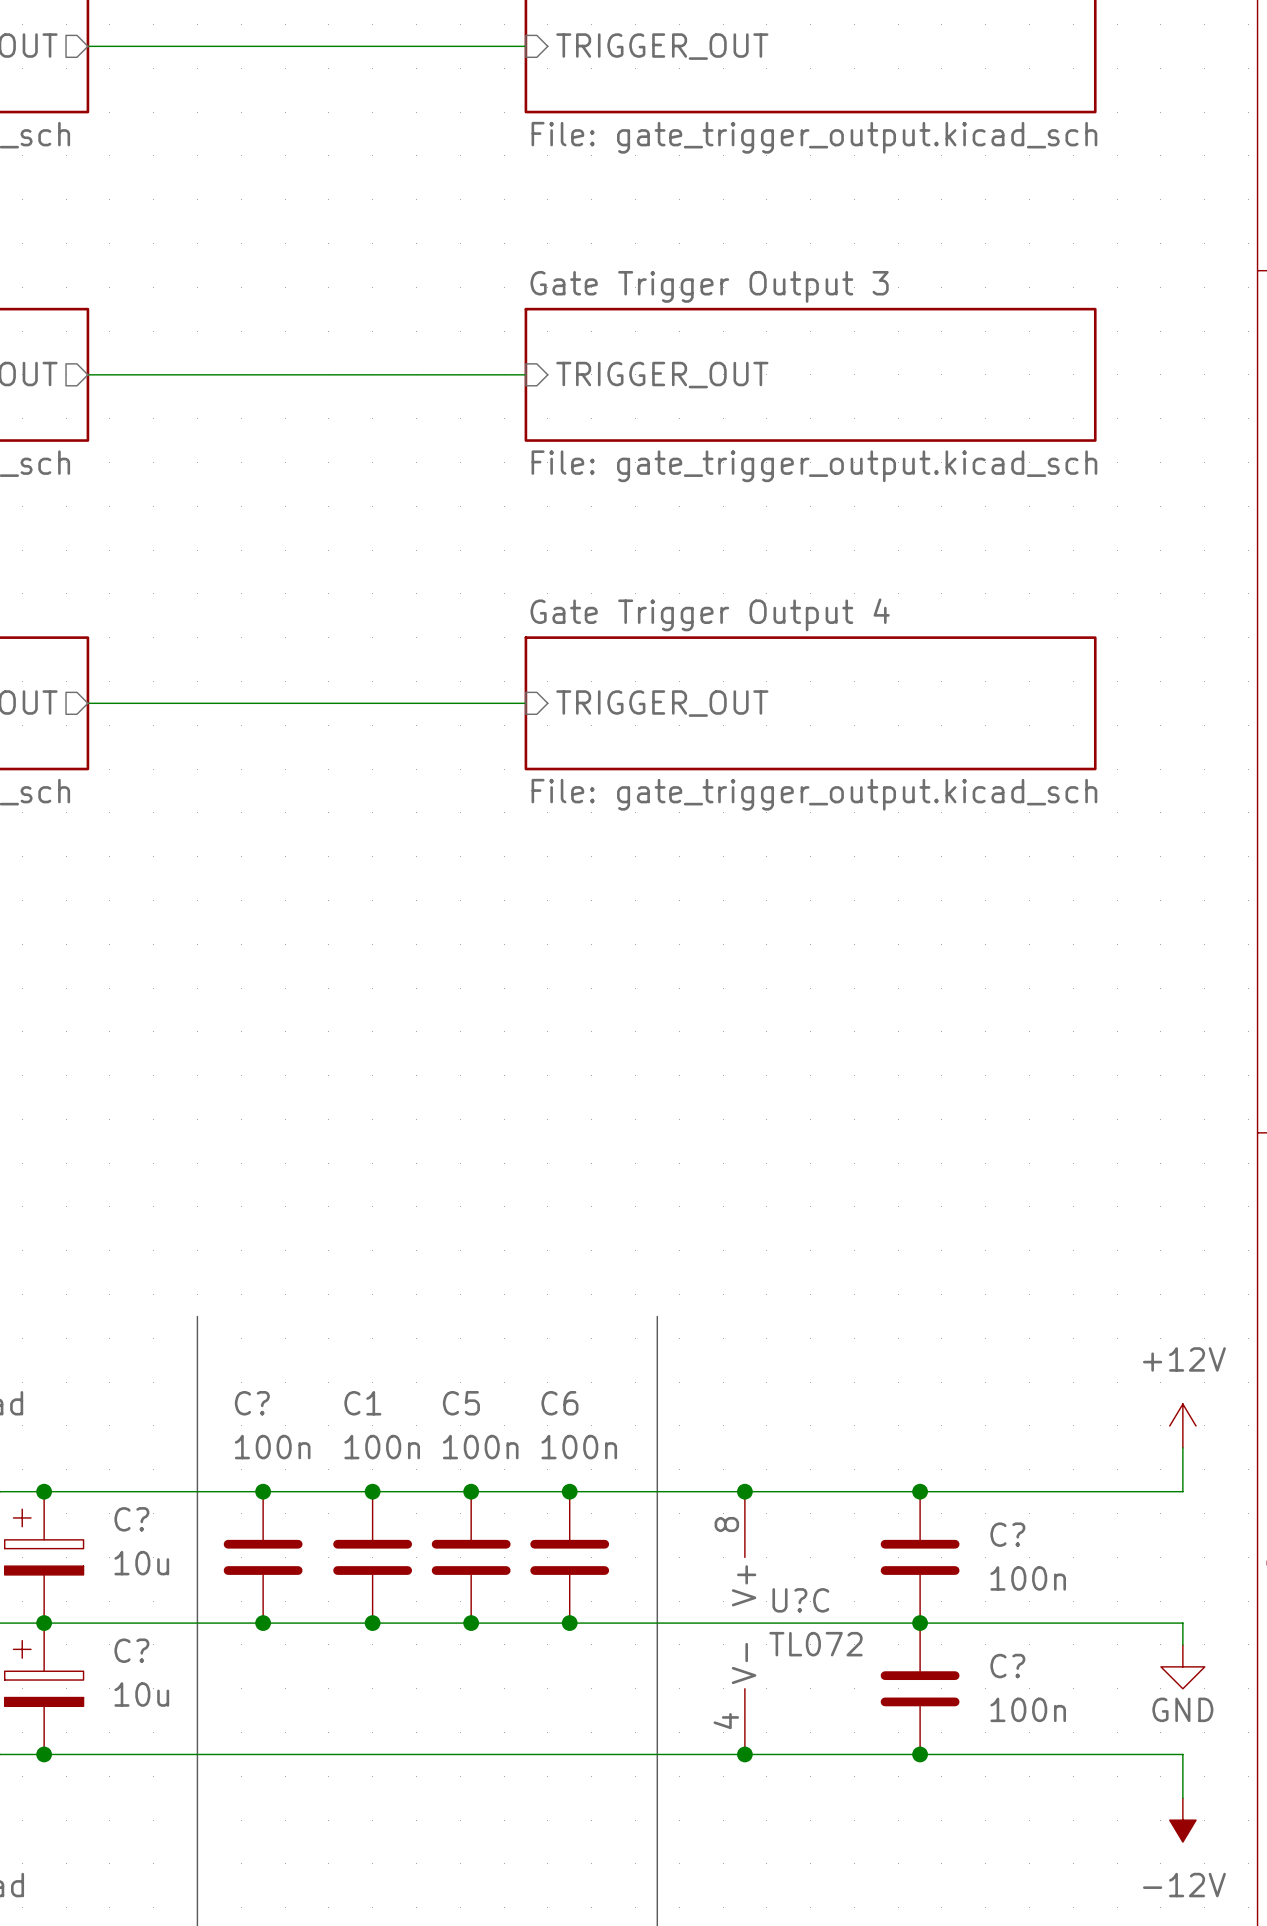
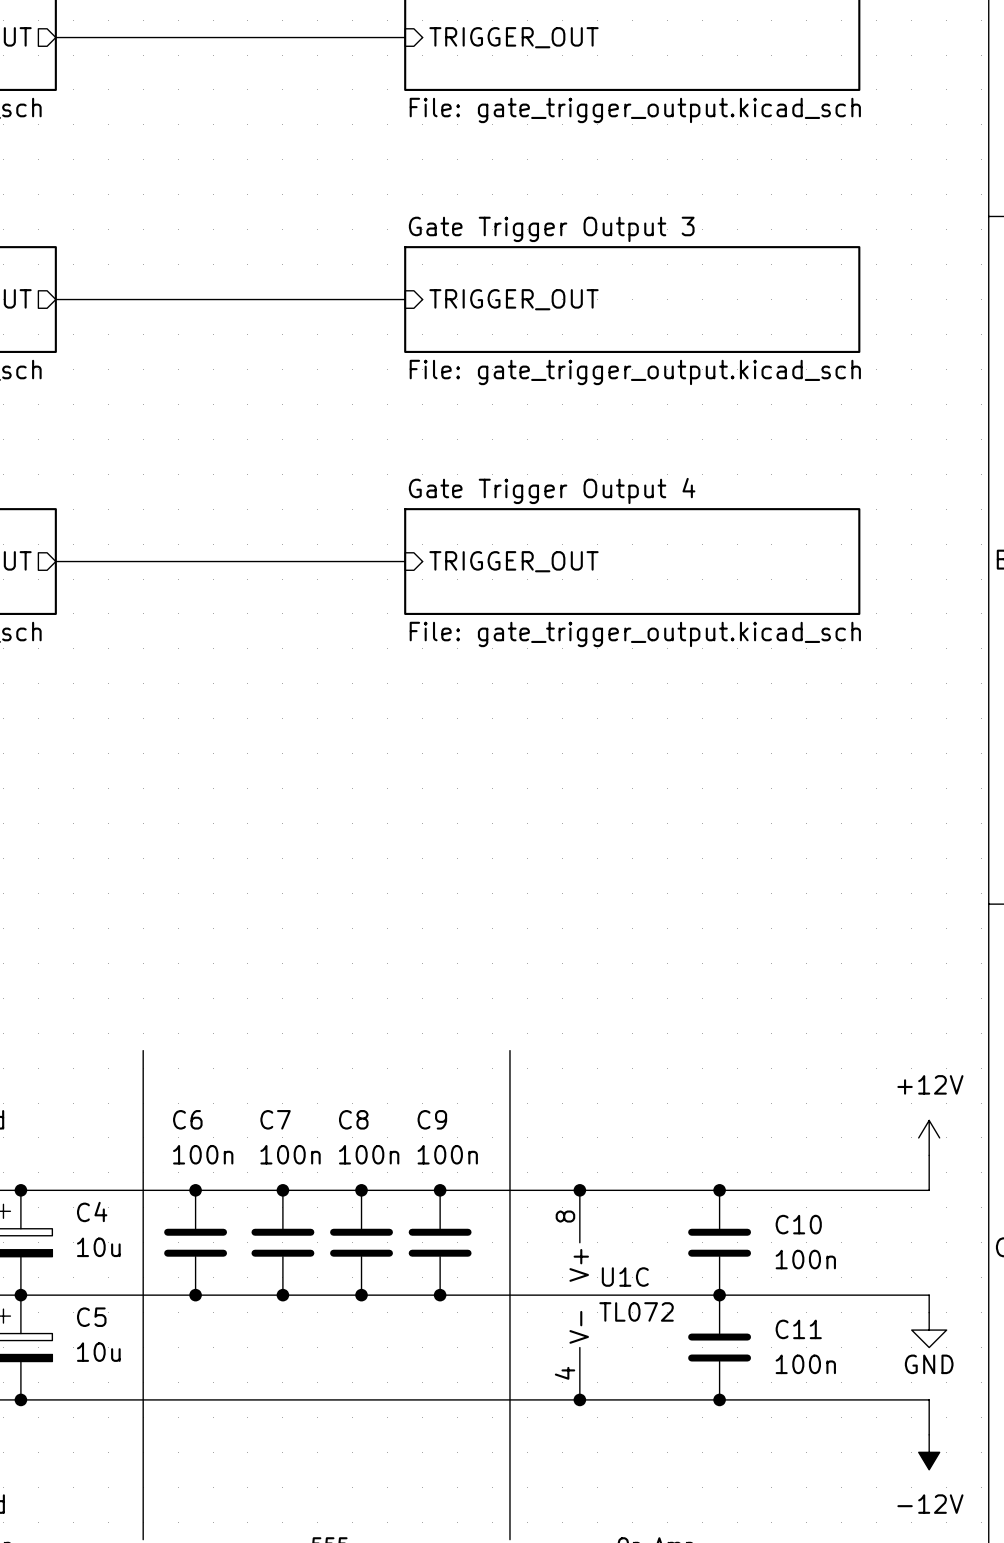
C? name: C? (252, 1403) -> C6 (187, 1119)
C1 name: C1 (362, 1403) -> C7 (275, 1119)
C5 name: C5 (461, 1403) -> C8 (353, 1119)
C6 name: C6 (559, 1403) -> C9 (432, 1119)
C? name: C? (131, 1519) -> C4 (92, 1211)
C? name: C? (1007, 1534) -> C10 (798, 1224)
U?C name: U?C (800, 1600) -> U1C (625, 1277)
C? name: C? (131, 1650) -> C5 (91, 1317)
C? name: C? (1007, 1666) -> C11 (798, 1329)

